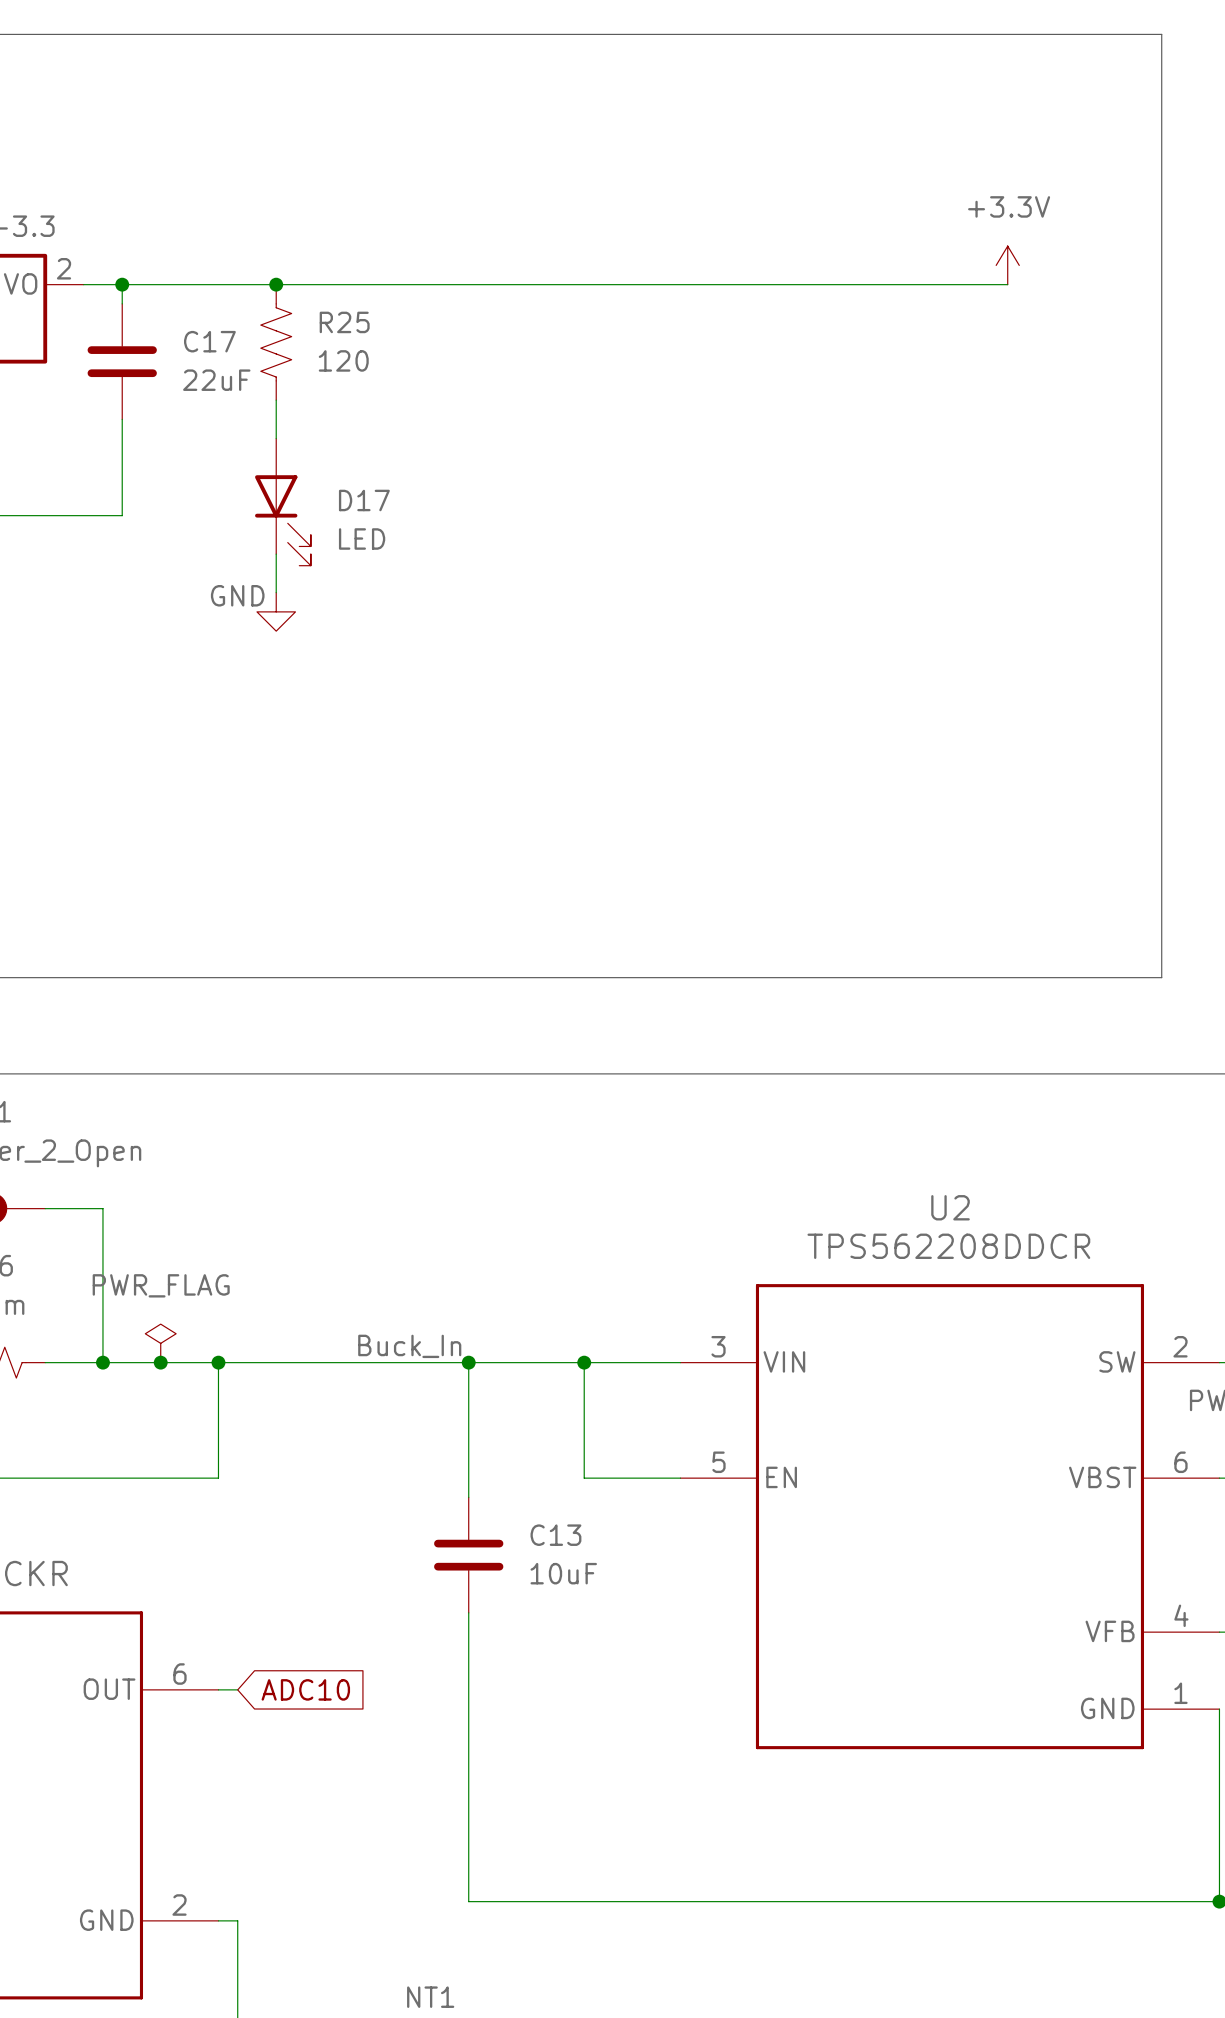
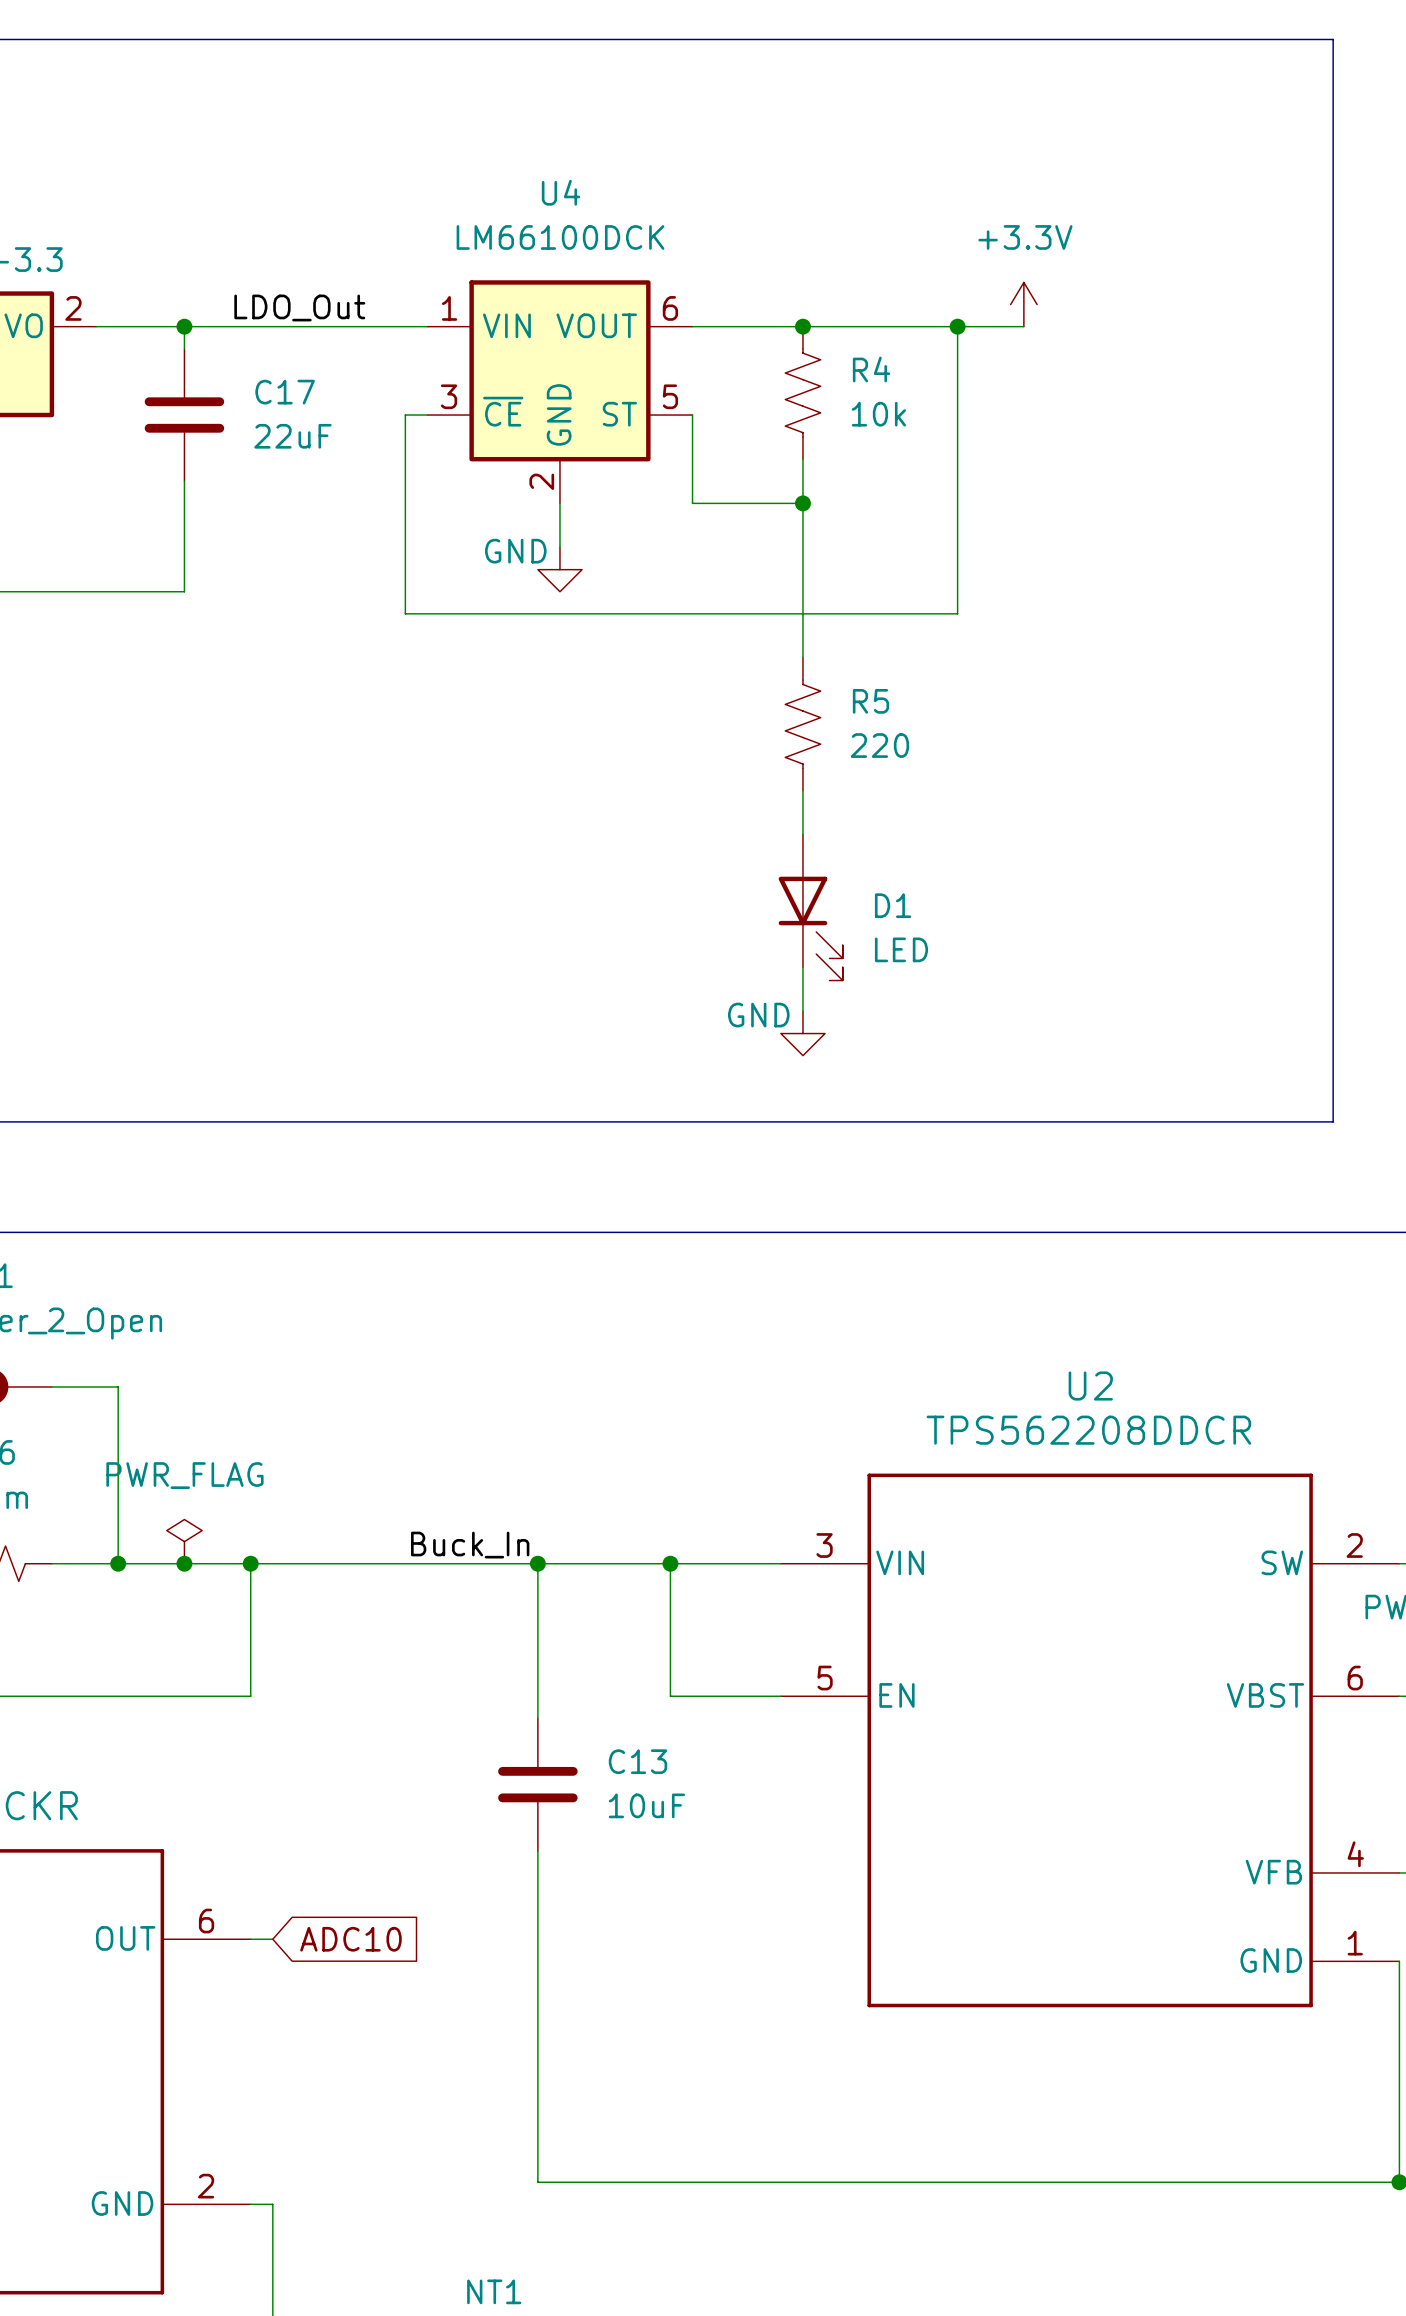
power symbol position: +3.3V (1007, 265) -> +3.3V (1023, 304)
label: none -> LDO_Out (299, 307)
wire: (122, 284) (122, 303) -> (184, 326) (184, 348)
junction position: (122, 284) -> (184, 326)
junction: (276, 284) -> none
junction: none -> (802, 326)
wire: none -> (957, 326) (957, 613) (405, 613) (405, 415) (427, 415)
junction: none -> (957, 326)
wire: (892, 284) (1007, 284) -> none
U4: none -> LM66100DCK (559, 391)
R25: 120 (276, 342) -> none
R4: none -> 10k (802, 392)
C17 position: (122, 361) -> (184, 415)
wire: none -> (692, 415) (692, 503) (802, 503)
wire: (276, 400) (276, 438) -> (559, 503) (559, 547)
wire: none -> (802, 459) (802, 658)
wire: (122, 419) (122, 515) -> (184, 481) (184, 591) (140, 591)
junction: none -> (802, 503)
D17: LED (282, 502) -> none
wire: (276, 554) (276, 592) -> none
power symbol position: GND (276, 611) -> GND (559, 569)
R5: none -> 220 (802, 724)
wire: none -> (802, 790) (802, 834)
D1: none -> LED (810, 907)
wire: none -> (802, 967) (802, 1011)
power symbol: none -> GND (802, 1033)

